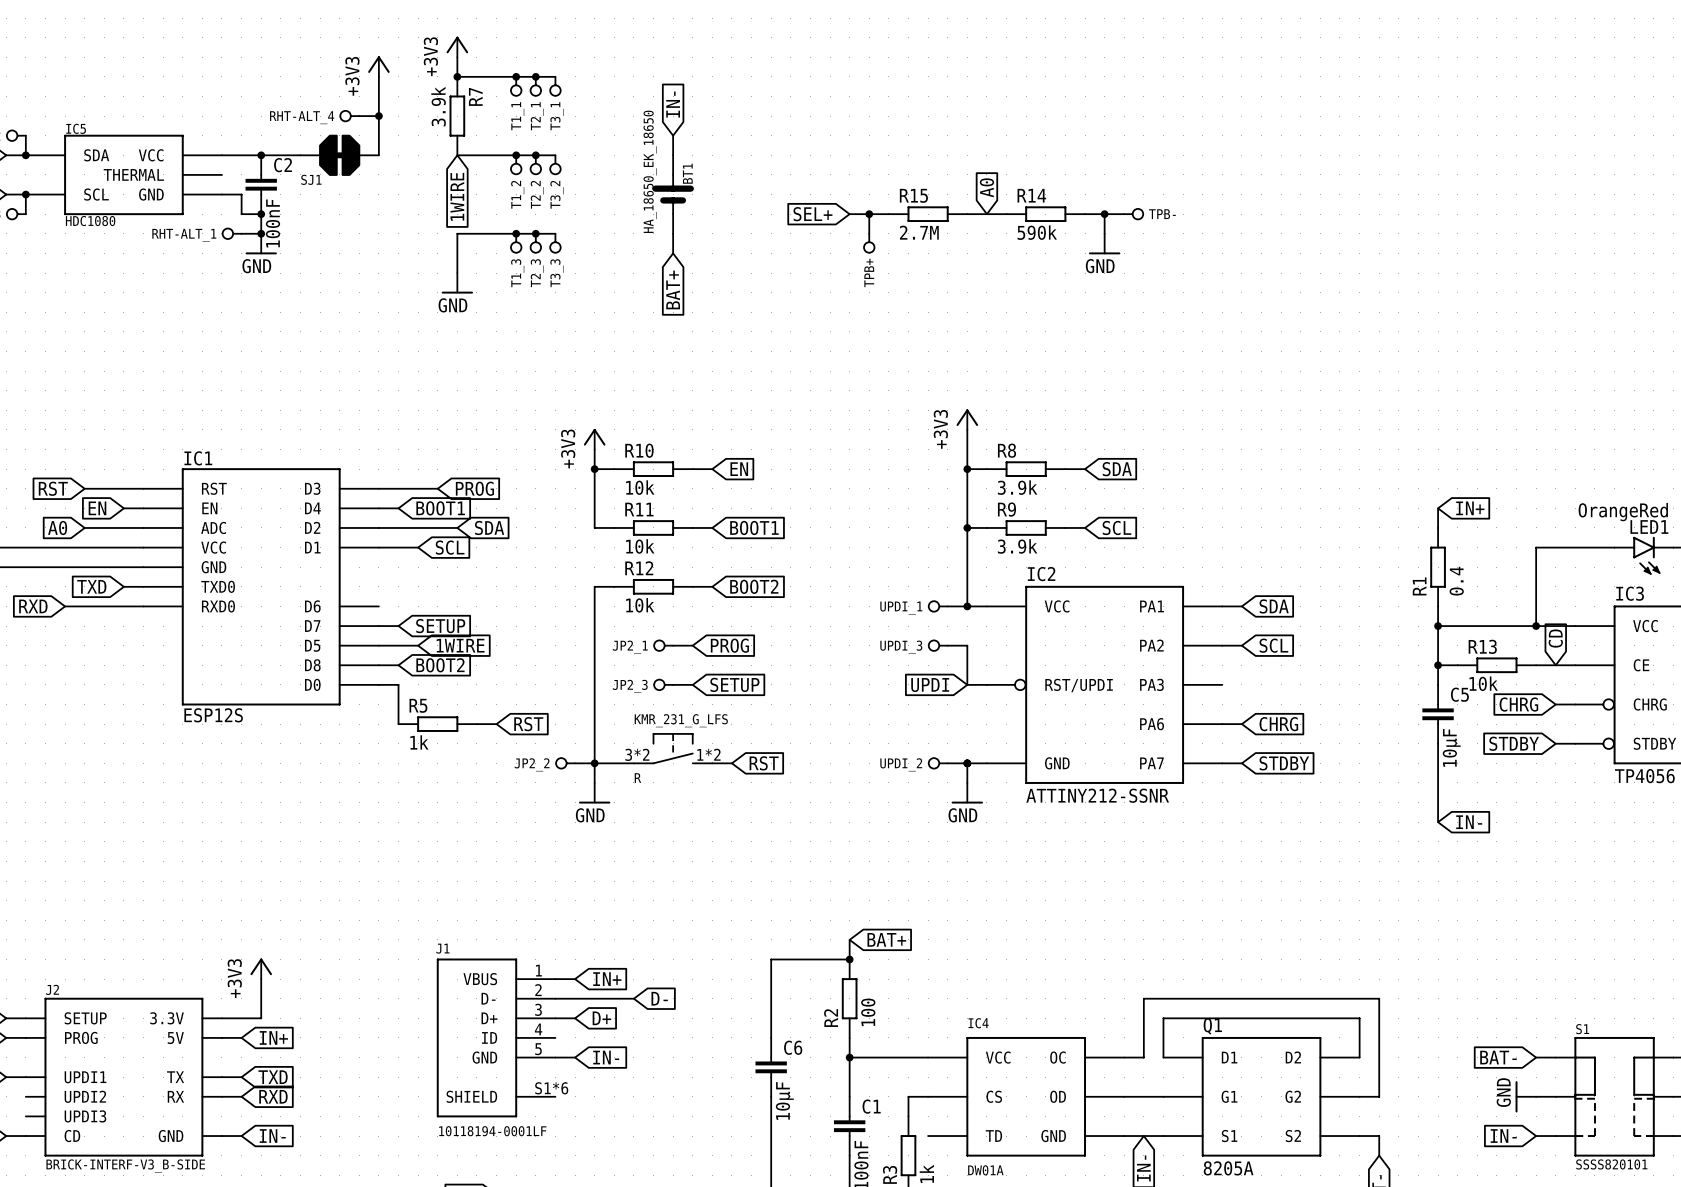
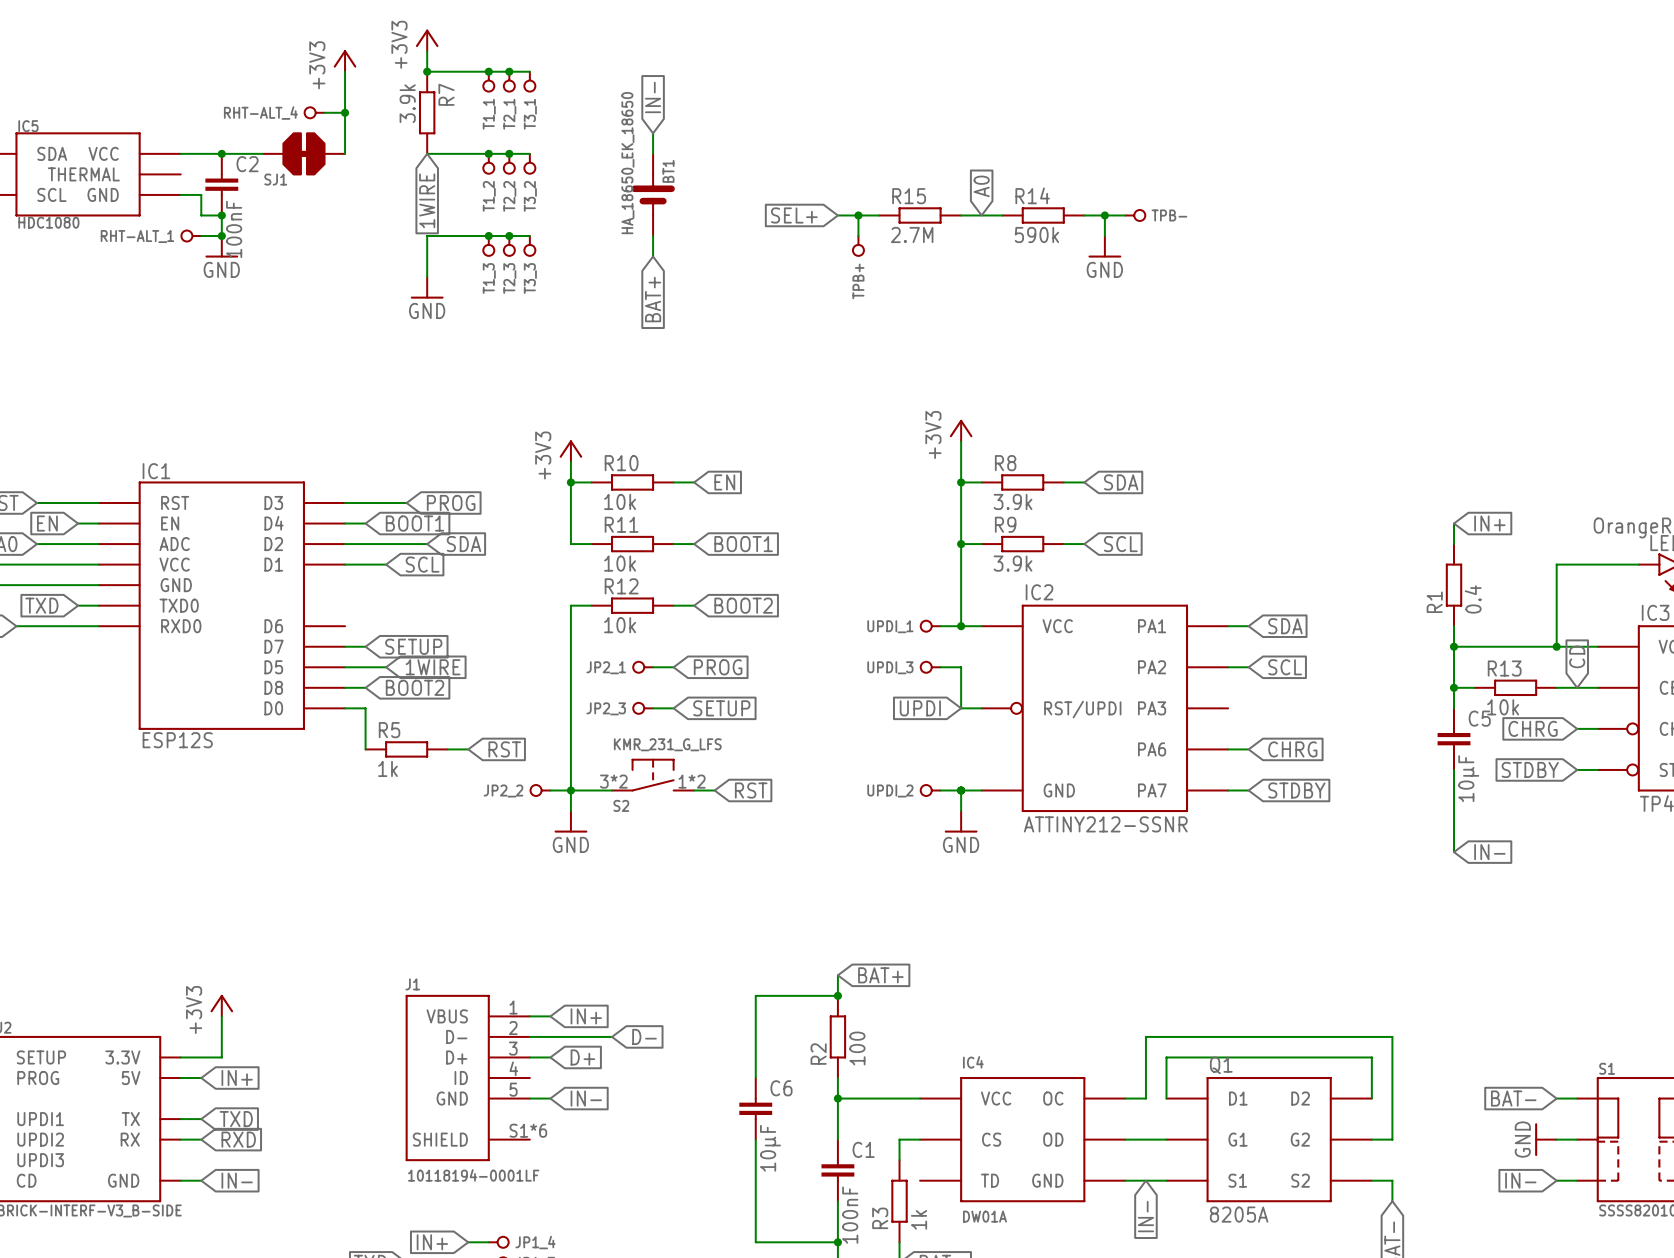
R name: R (637, 778) -> S2 (621, 805)

